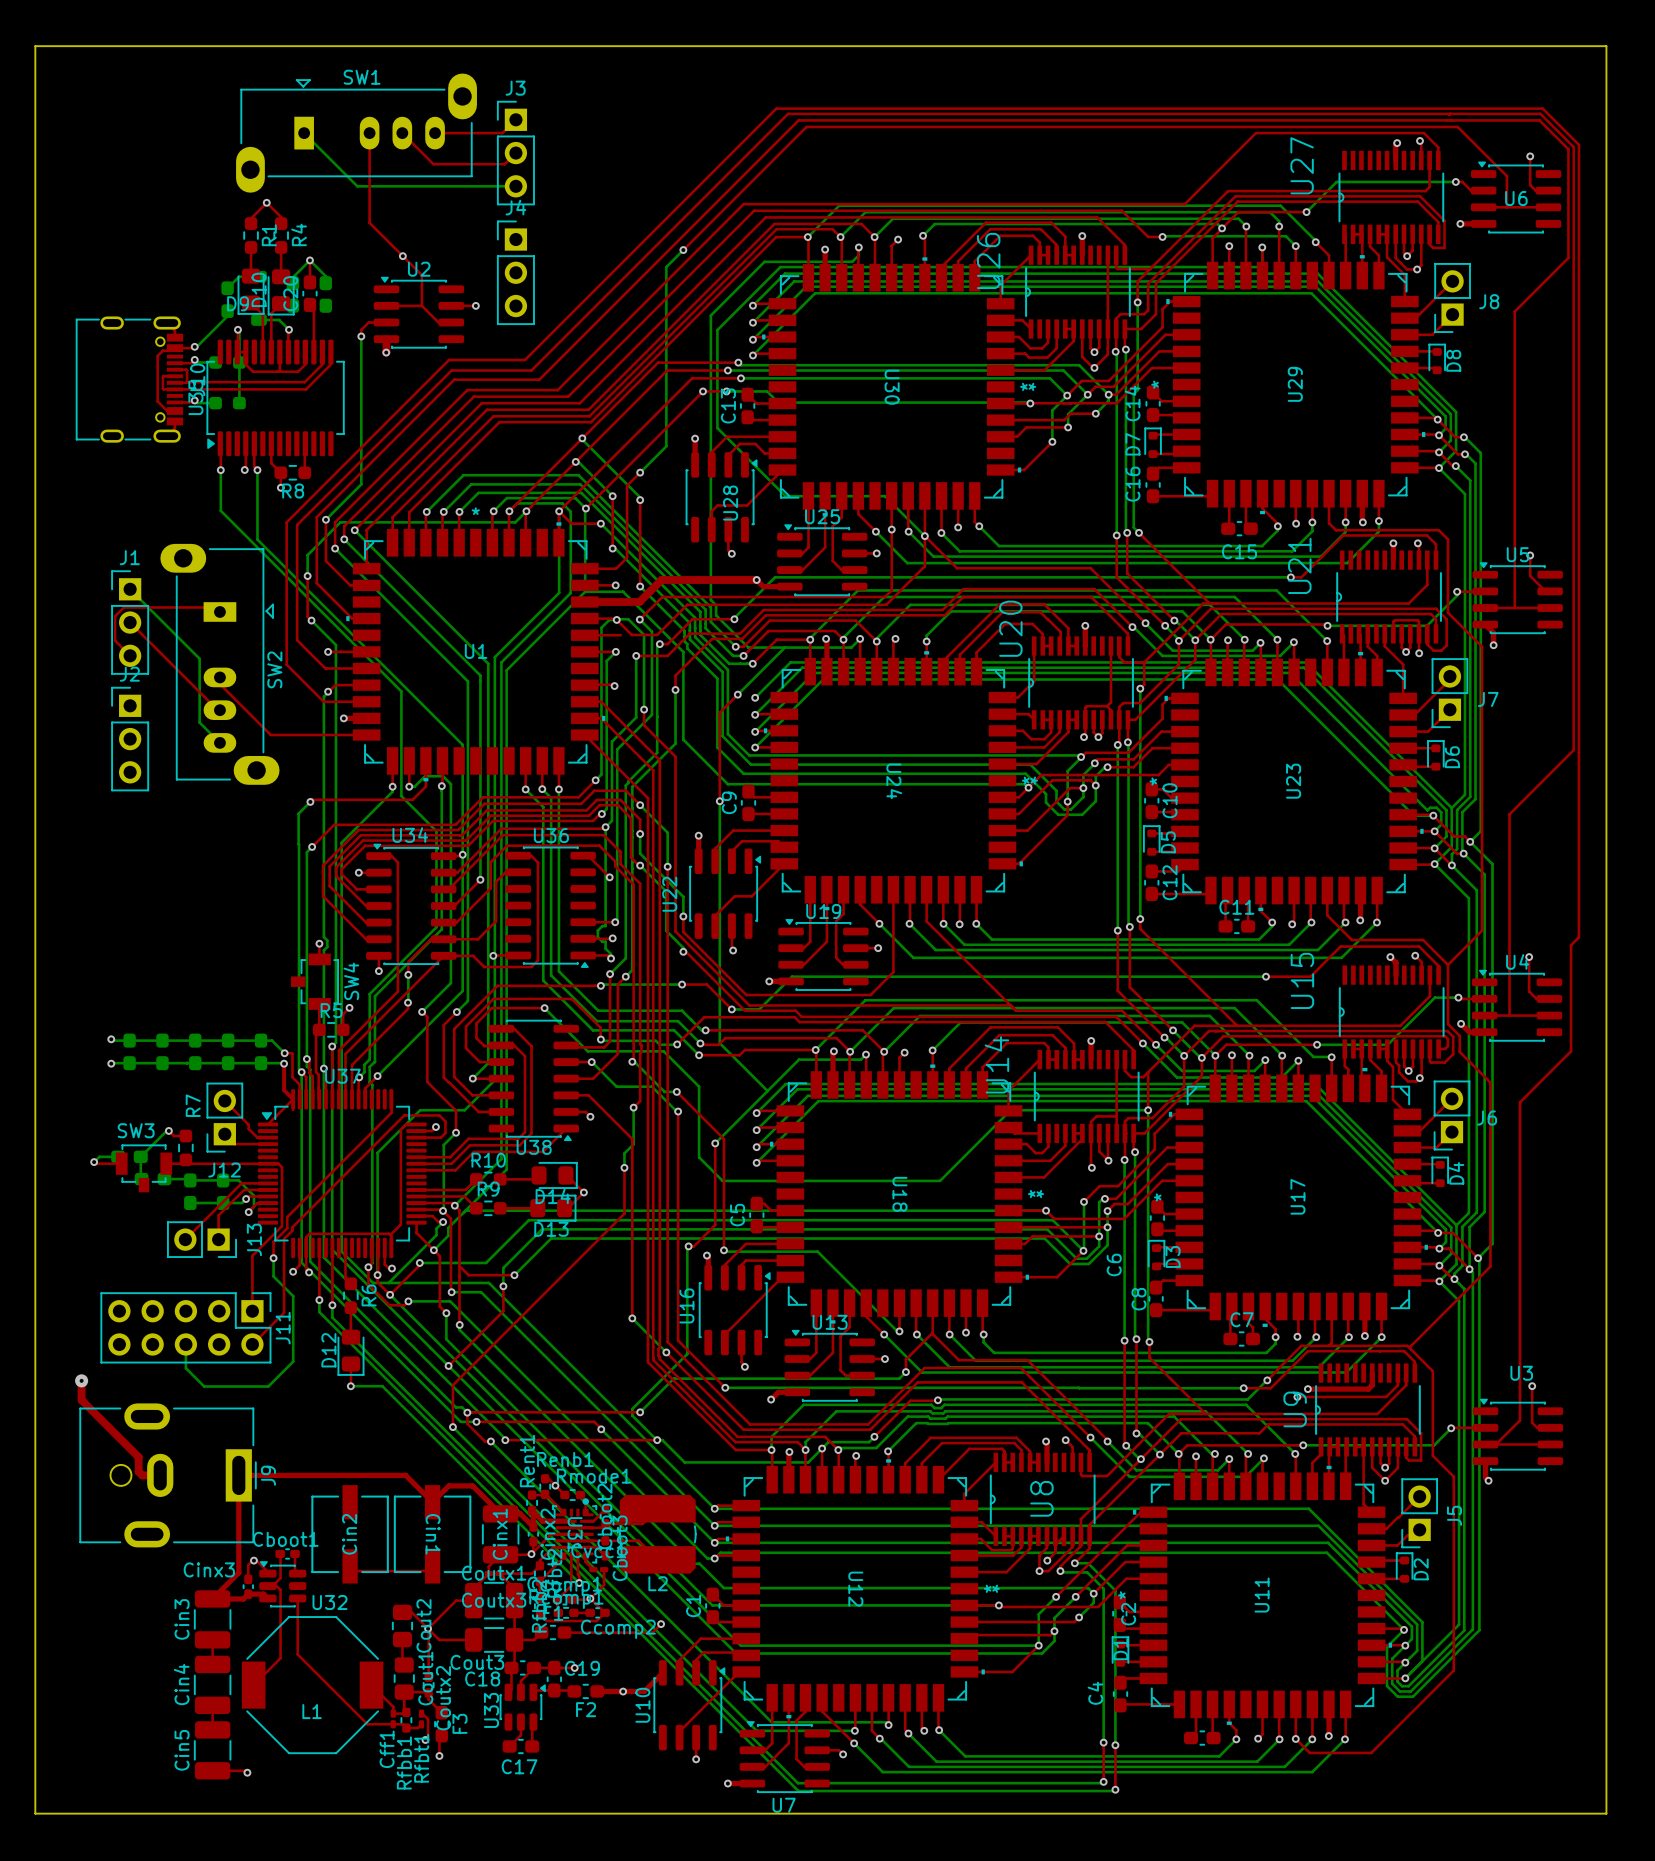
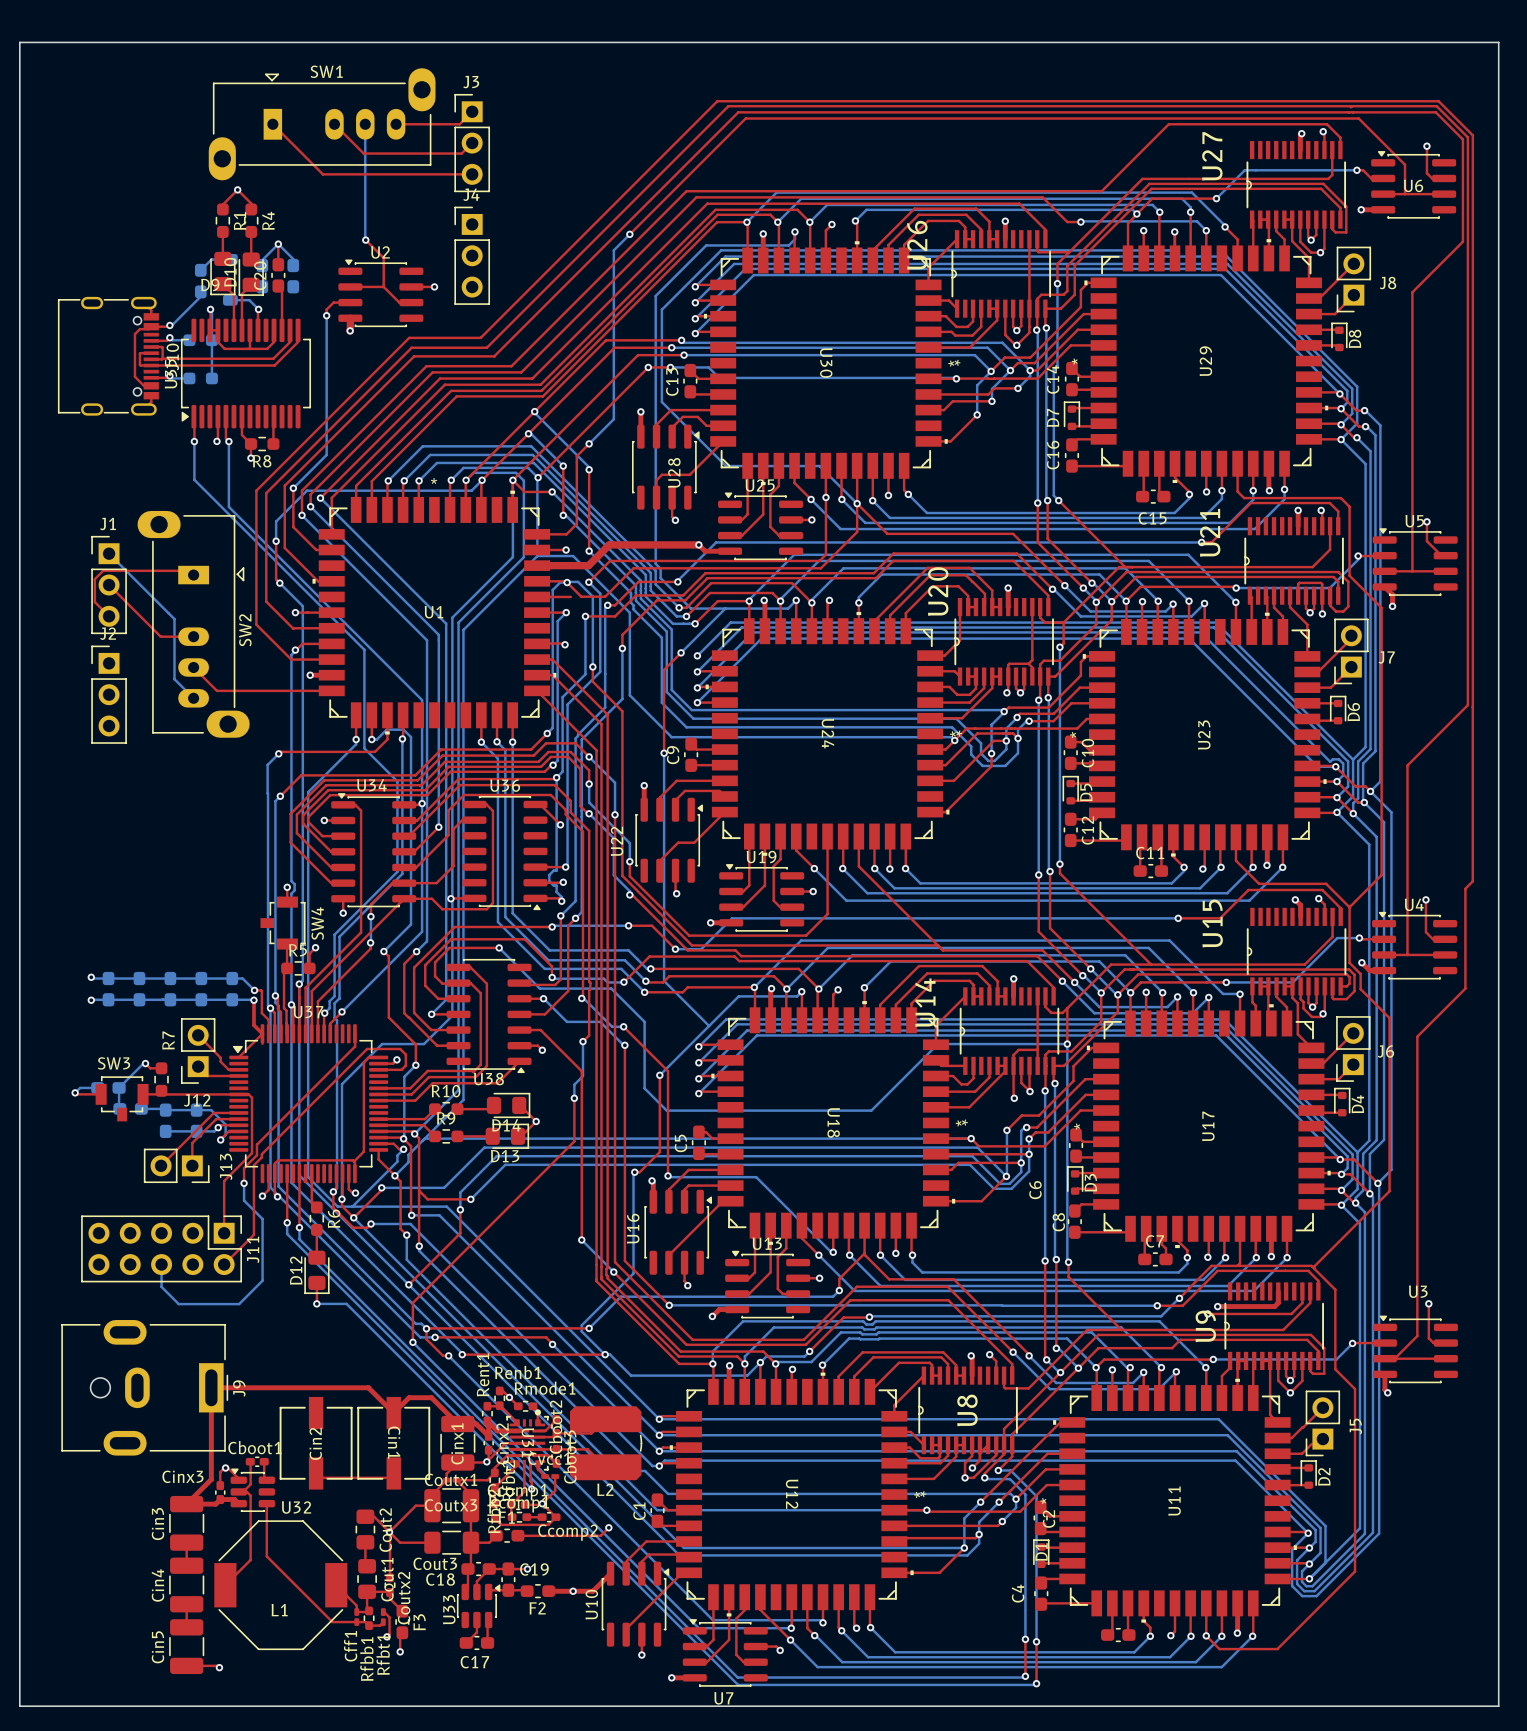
top track: none -> (272, 124) (322, 174) (472, 174)
bottom track: (304, 133) (357, 186) (515, 186) -> none
top track: (369, 133) (369, 222) (402, 256) -> none
top track: (402, 133) (433, 164) -> (334, 124) (363, 153) (394, 153)
bottom track: none -> (365, 124) (365, 239)
top track: (185, 677) (219, 710) -> (160, 636) (193, 636)
top track: (219, 677) (219, 684) (270, 735) -> (193, 667) (216, 690) (241, 690)
top track: (81, 1380) (81, 1400) (138, 1457) (138, 1471) (142, 1475) (160, 1475) -> none
via: (81, 1380) -> none

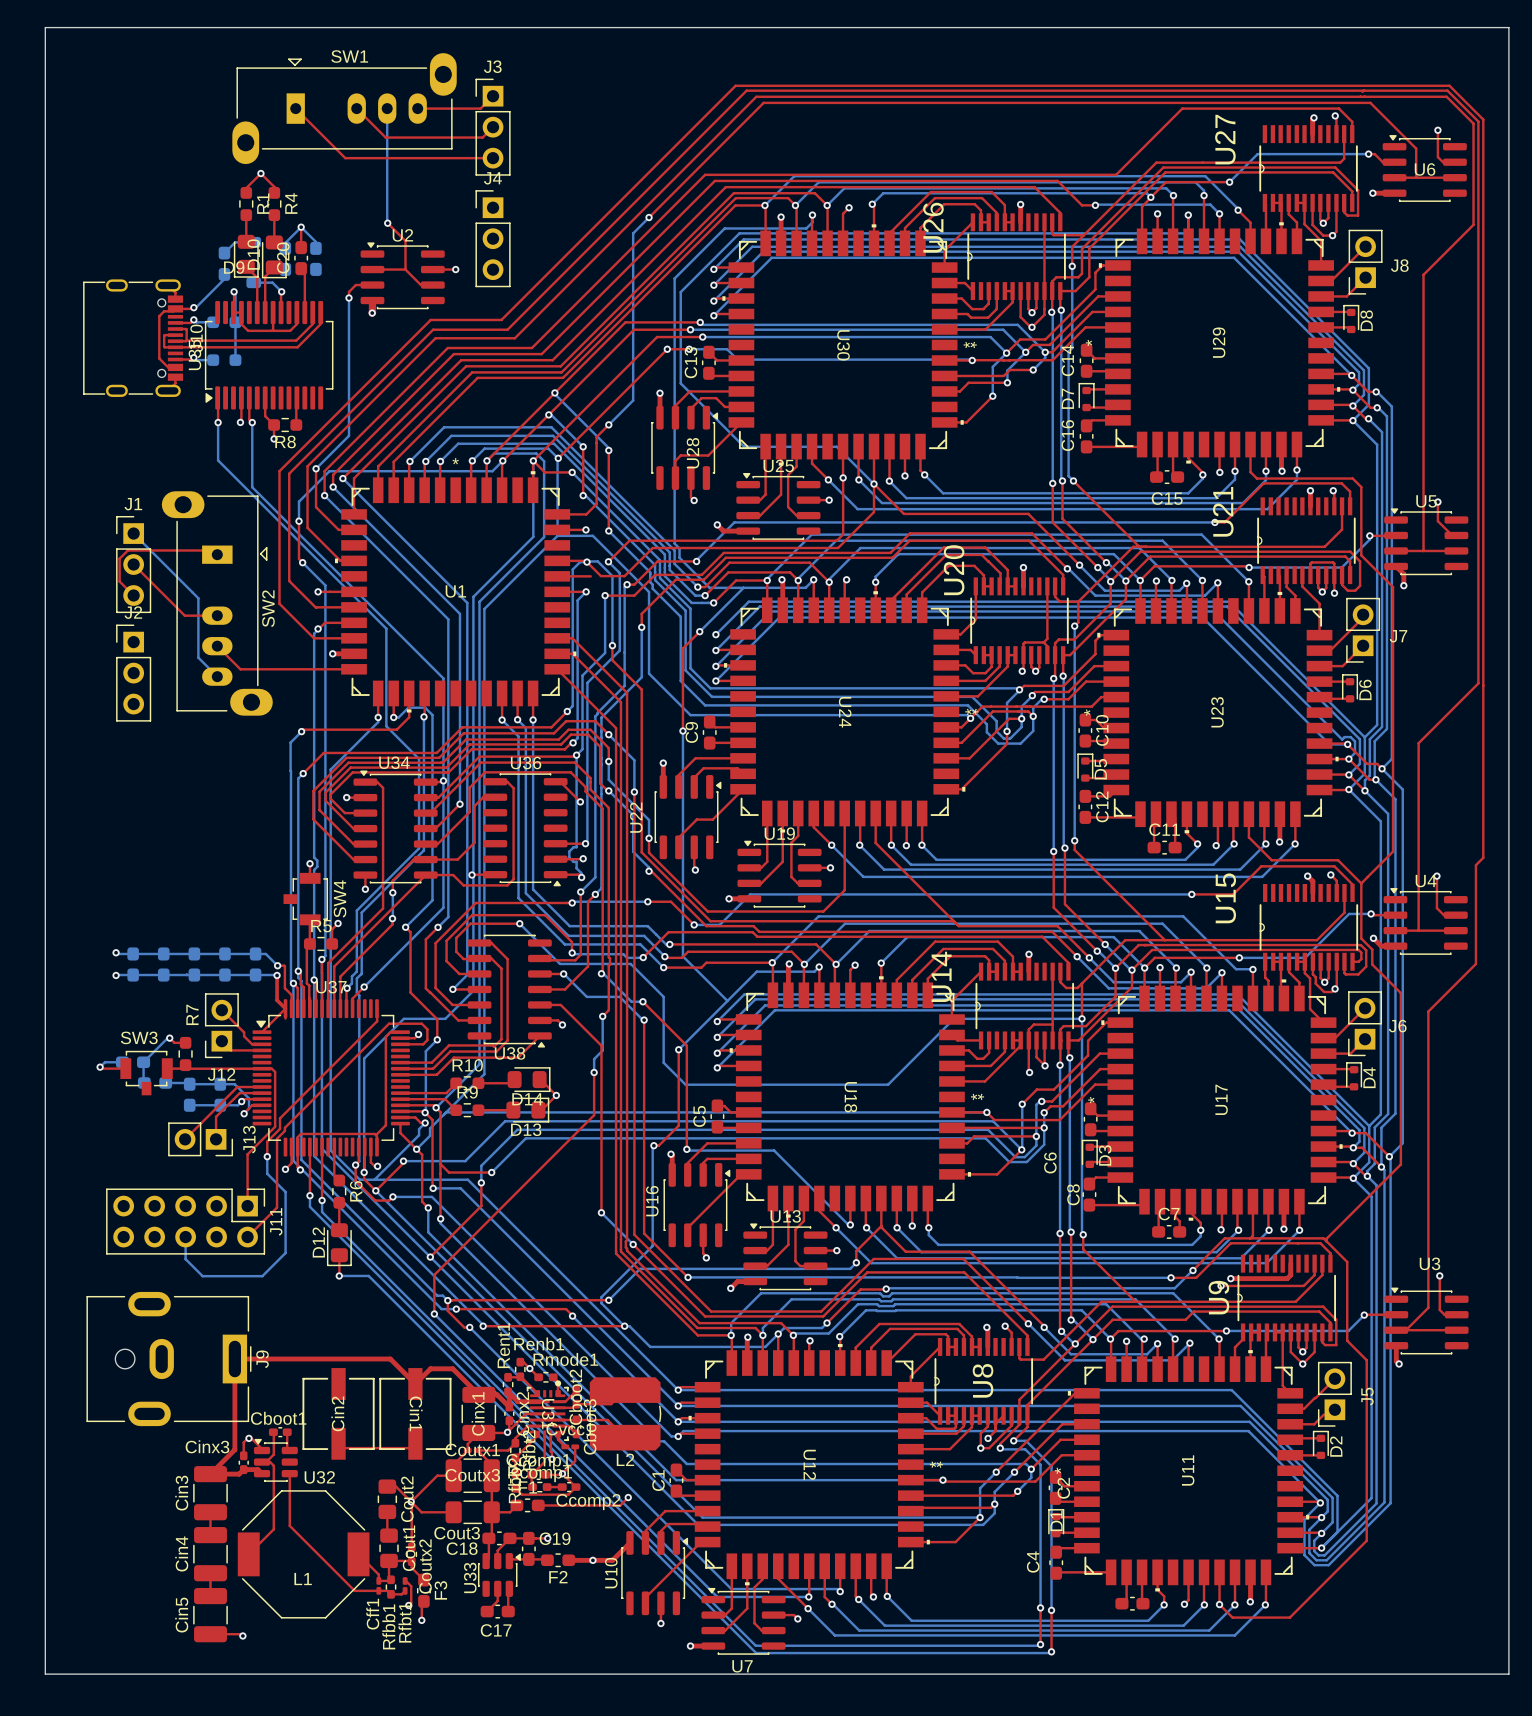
top track: (698, 544) (609, 544) (588, 565) (537, 565) -> none
top track: (537, 643) (565, 644) -> none
via: (565, 644) -> none

